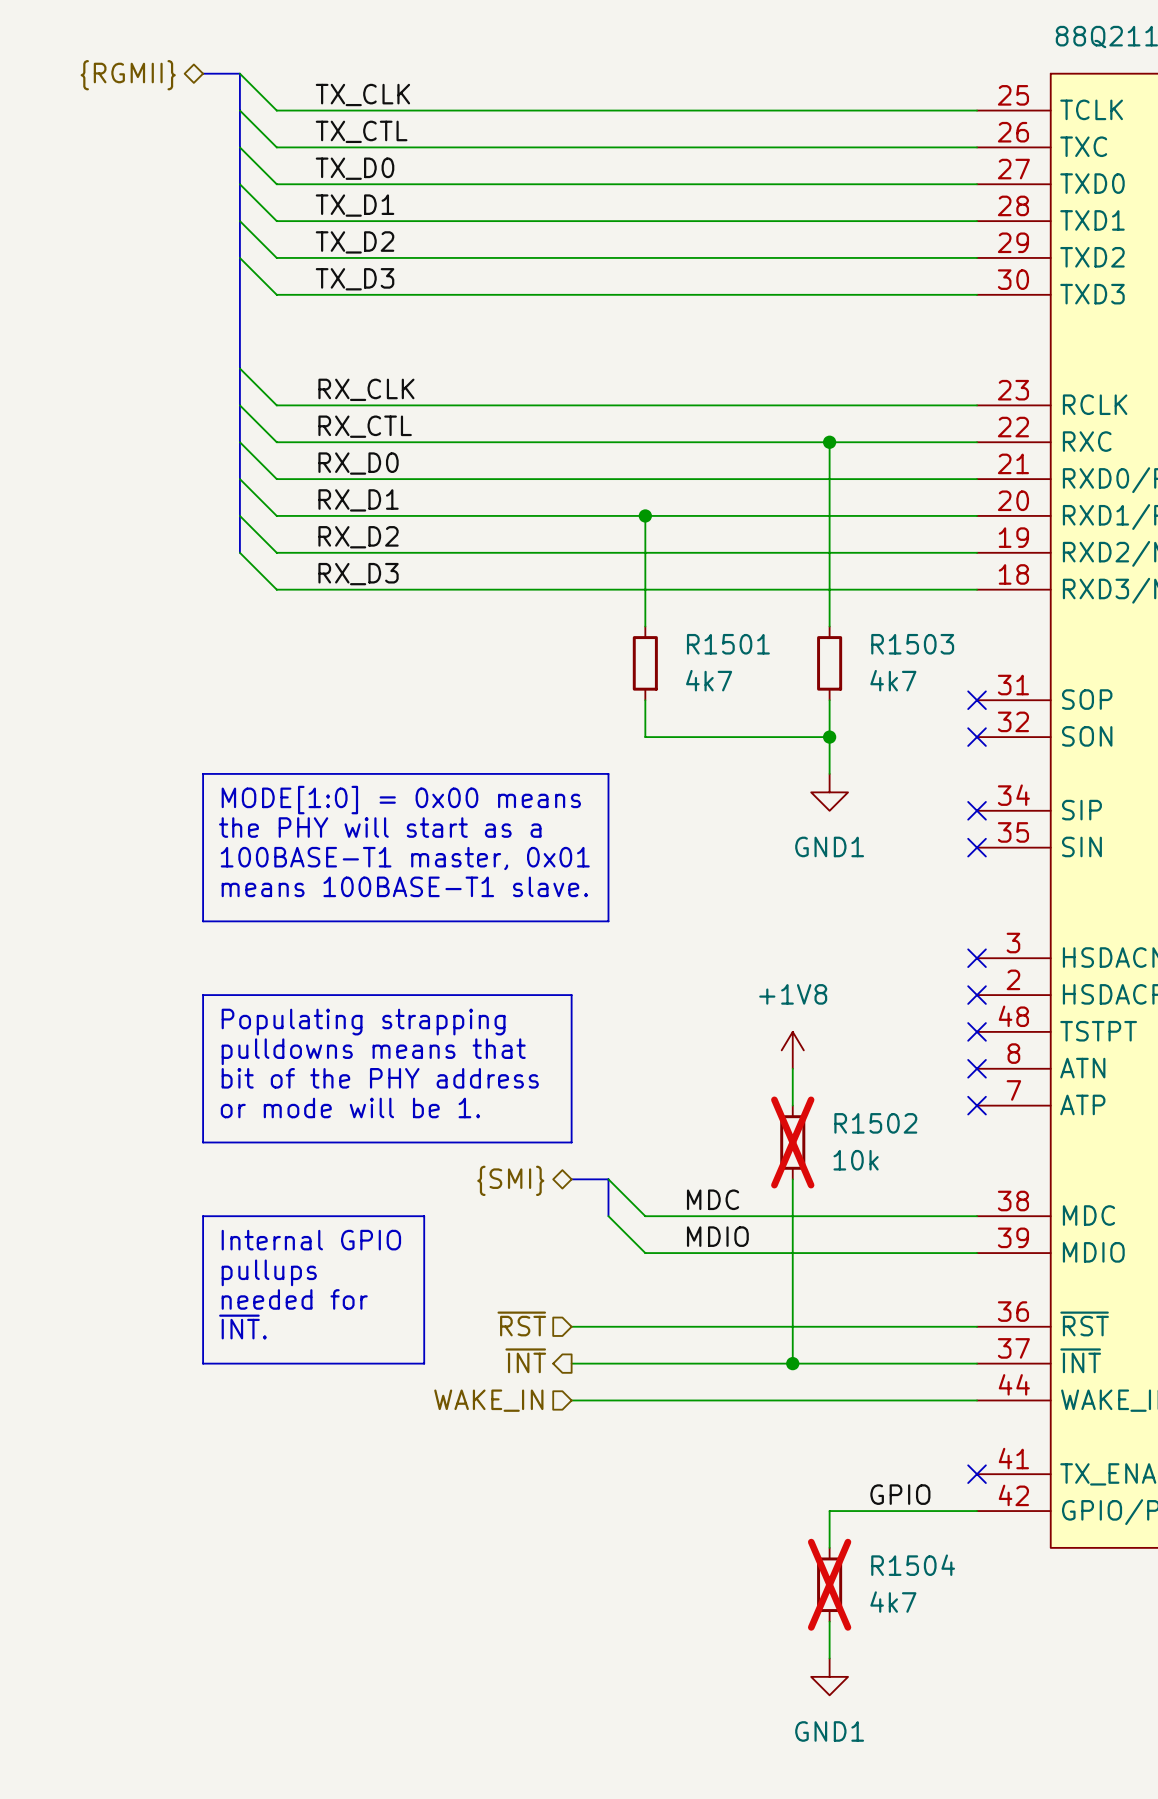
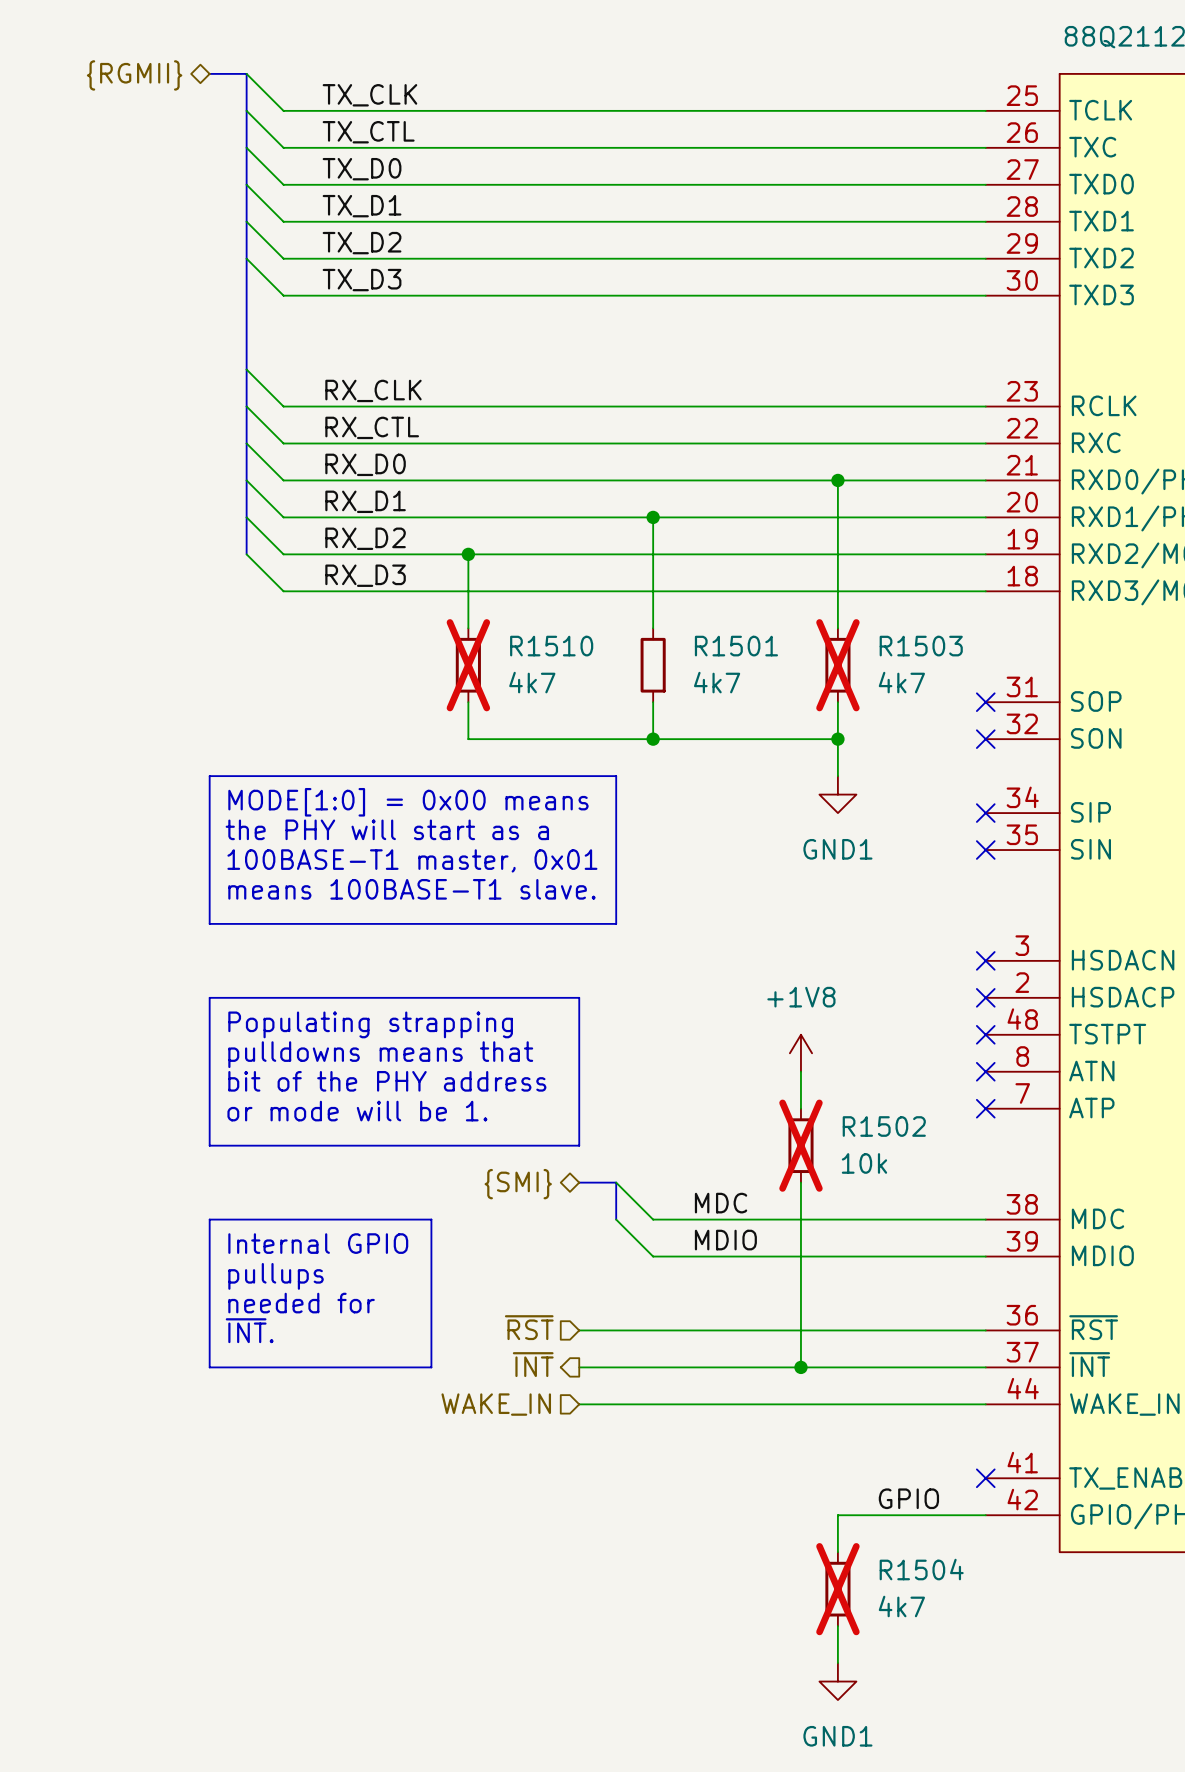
wire: (829, 442) (829, 479) -> none
junction position: (829, 442) -> (837, 480)
wire: none -> (468, 554) (468, 628)
junction: none -> (468, 554)
R1510: none -> 4k7 (468, 665)
R1503 do-not-place cross: none -> (837, 665)
wire: none -> (468, 702) (468, 739) (653, 739)
junction: none -> (653, 739)

